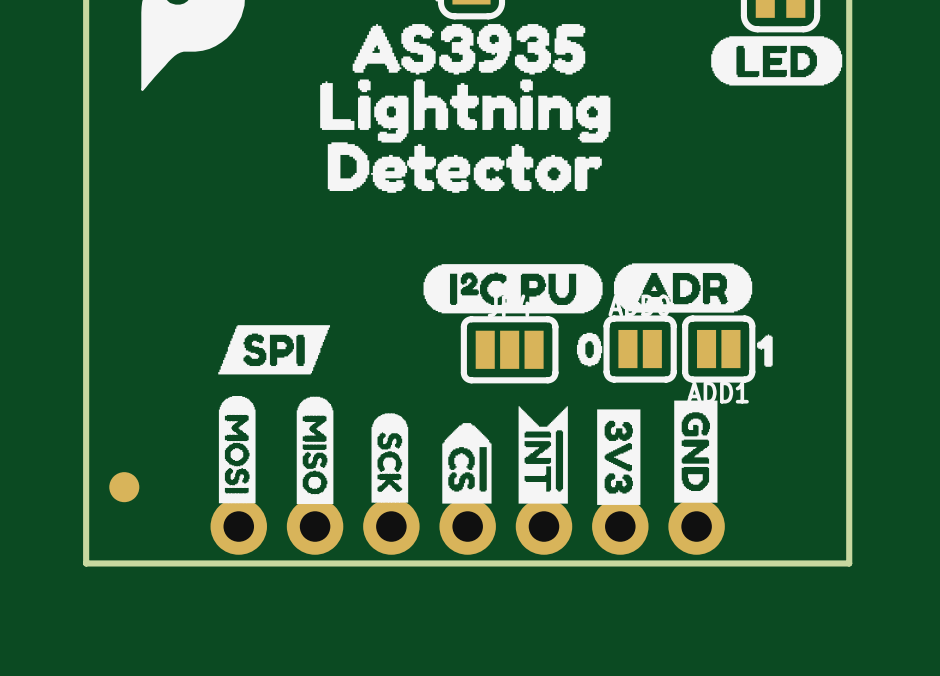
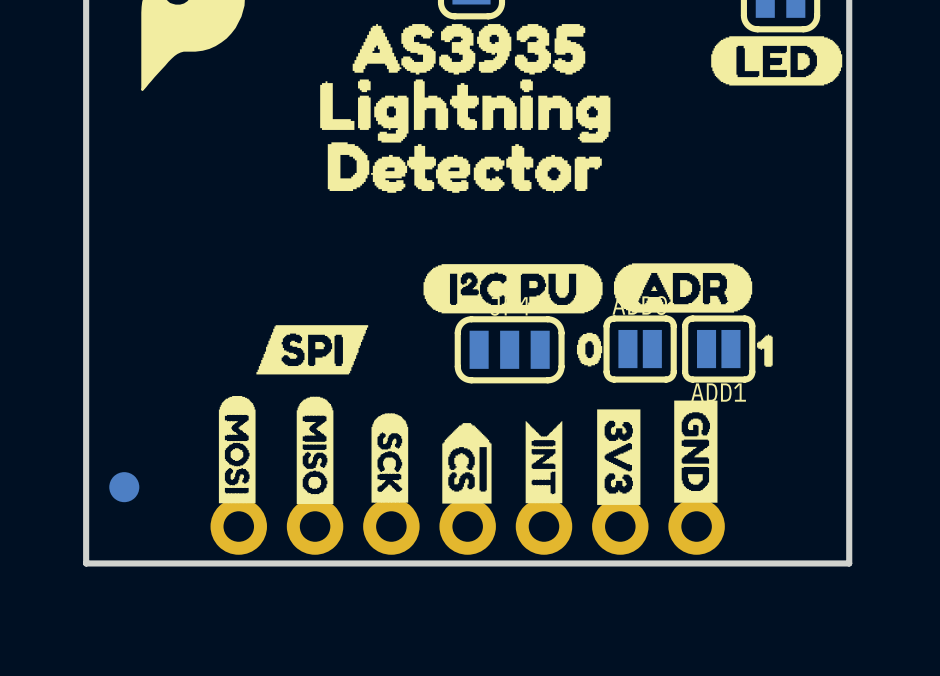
part footprint: [460, 316, 559, 384] -> [454, 316, 565, 384]
drawing position: (274, 349) -> (312, 349)
drawing shape: [518, 406, 568, 504] -> [525, 421, 563, 504]

